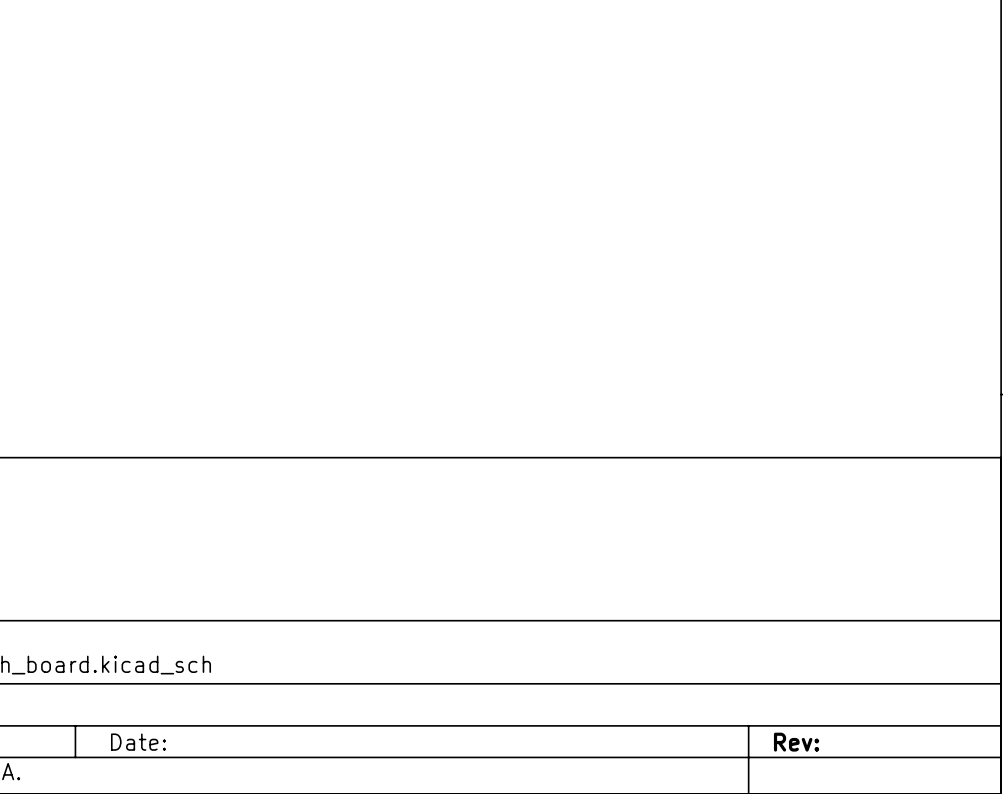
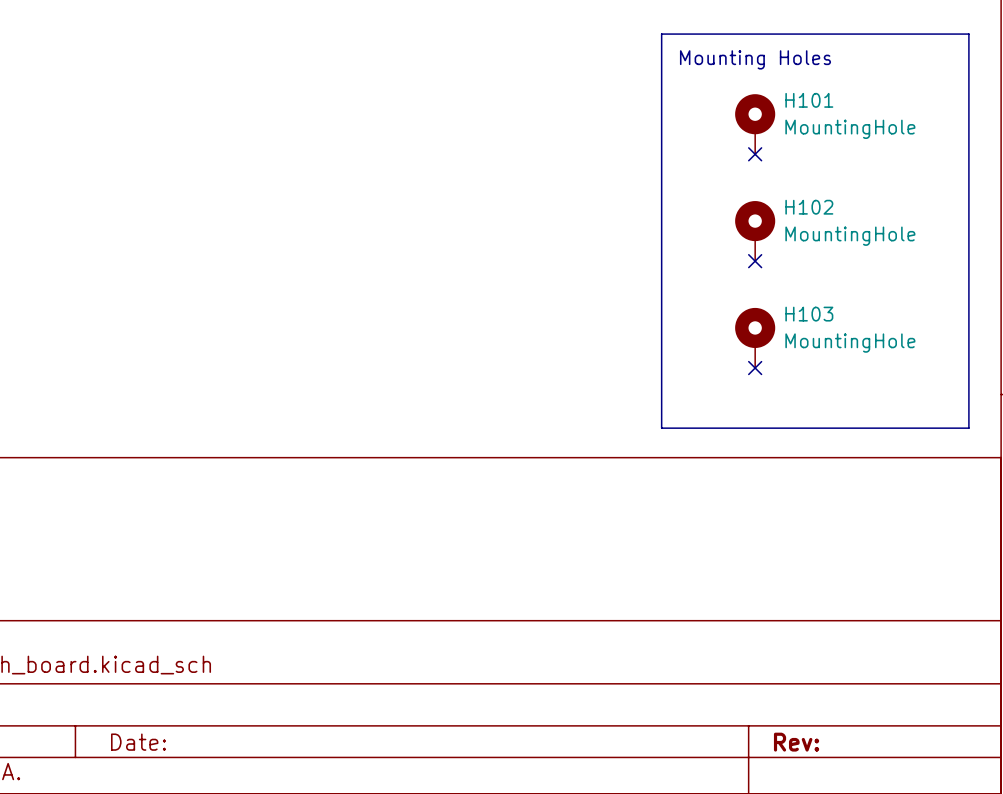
line: none -> (661, 34) (968, 34) (968, 428) (661, 428) (661, 34)
text: none -> Mounting Holes (755, 59)
H101: none -> MountingHole (755, 124)
no-connect mark: none -> (755, 154)
H102: none -> MountingHole (755, 231)
no-connect mark: none -> (755, 261)
H103: none -> MountingHole (755, 337)
no-connect mark: none -> (755, 368)

